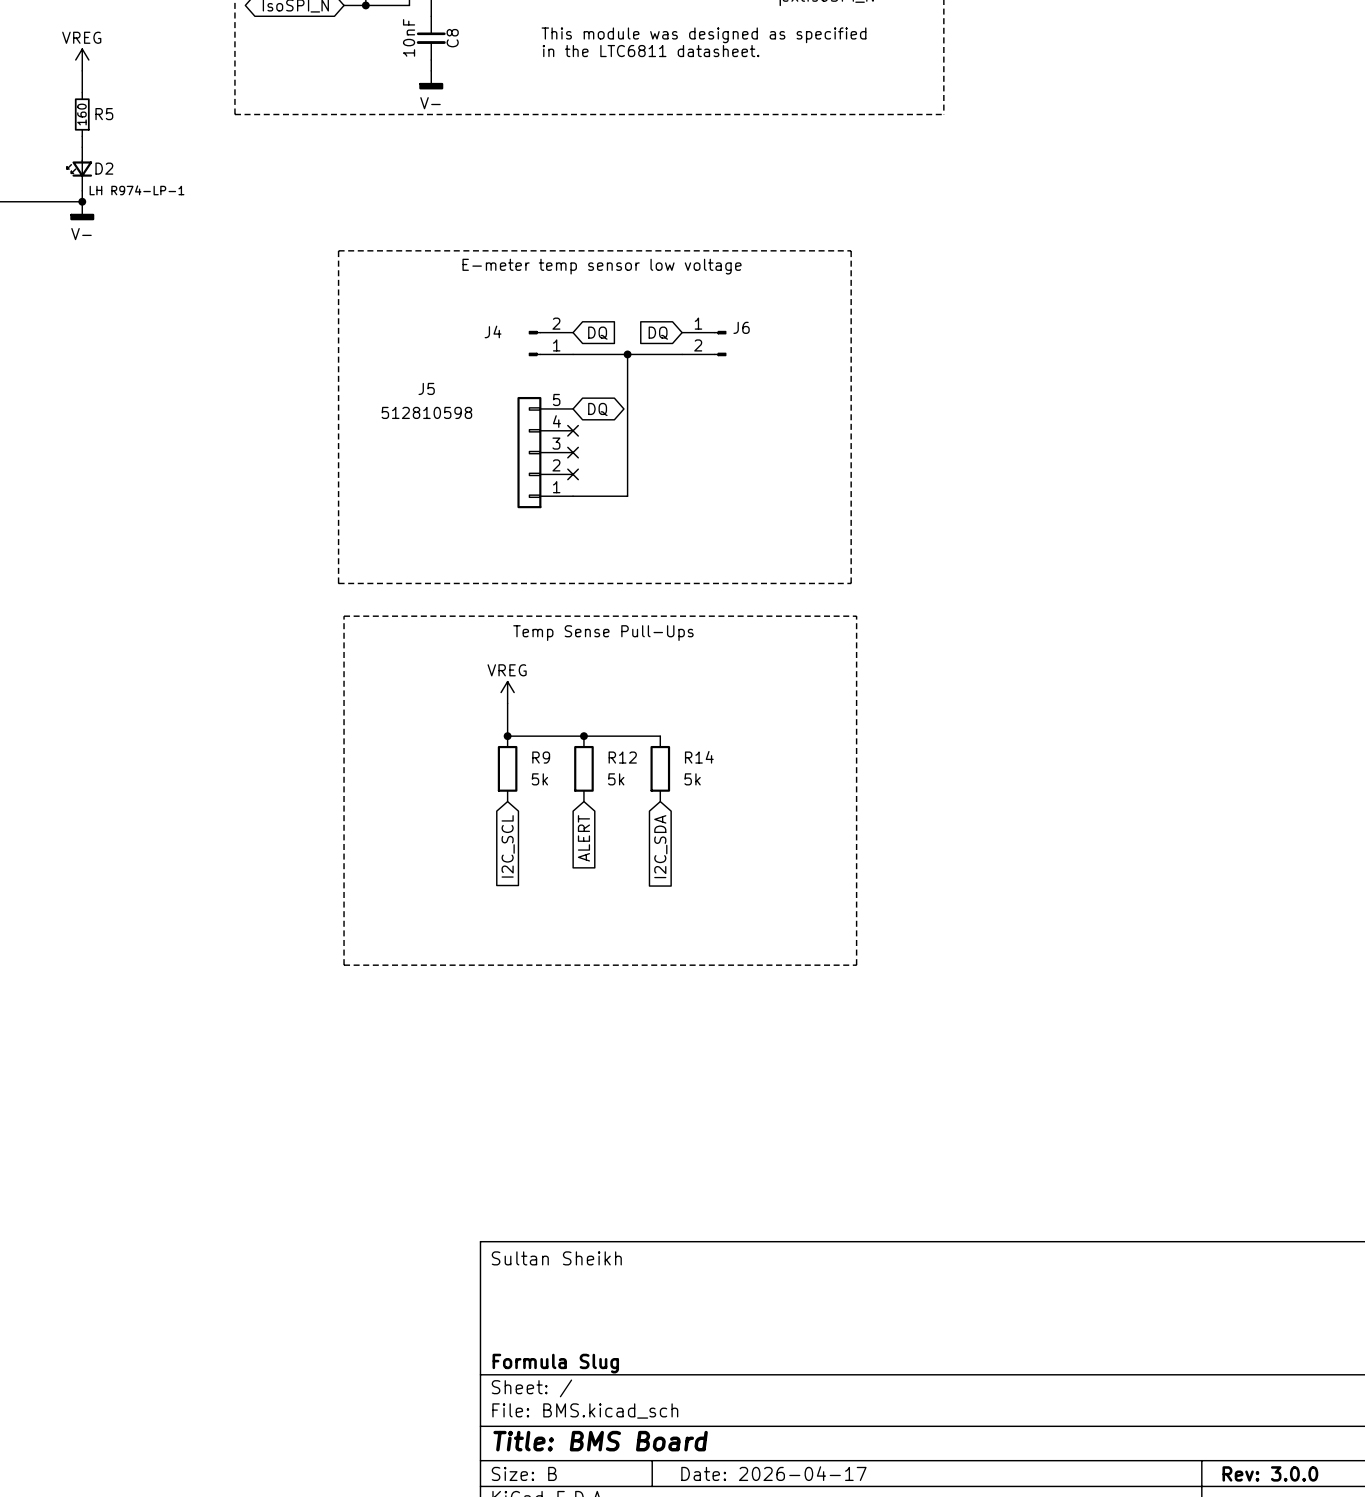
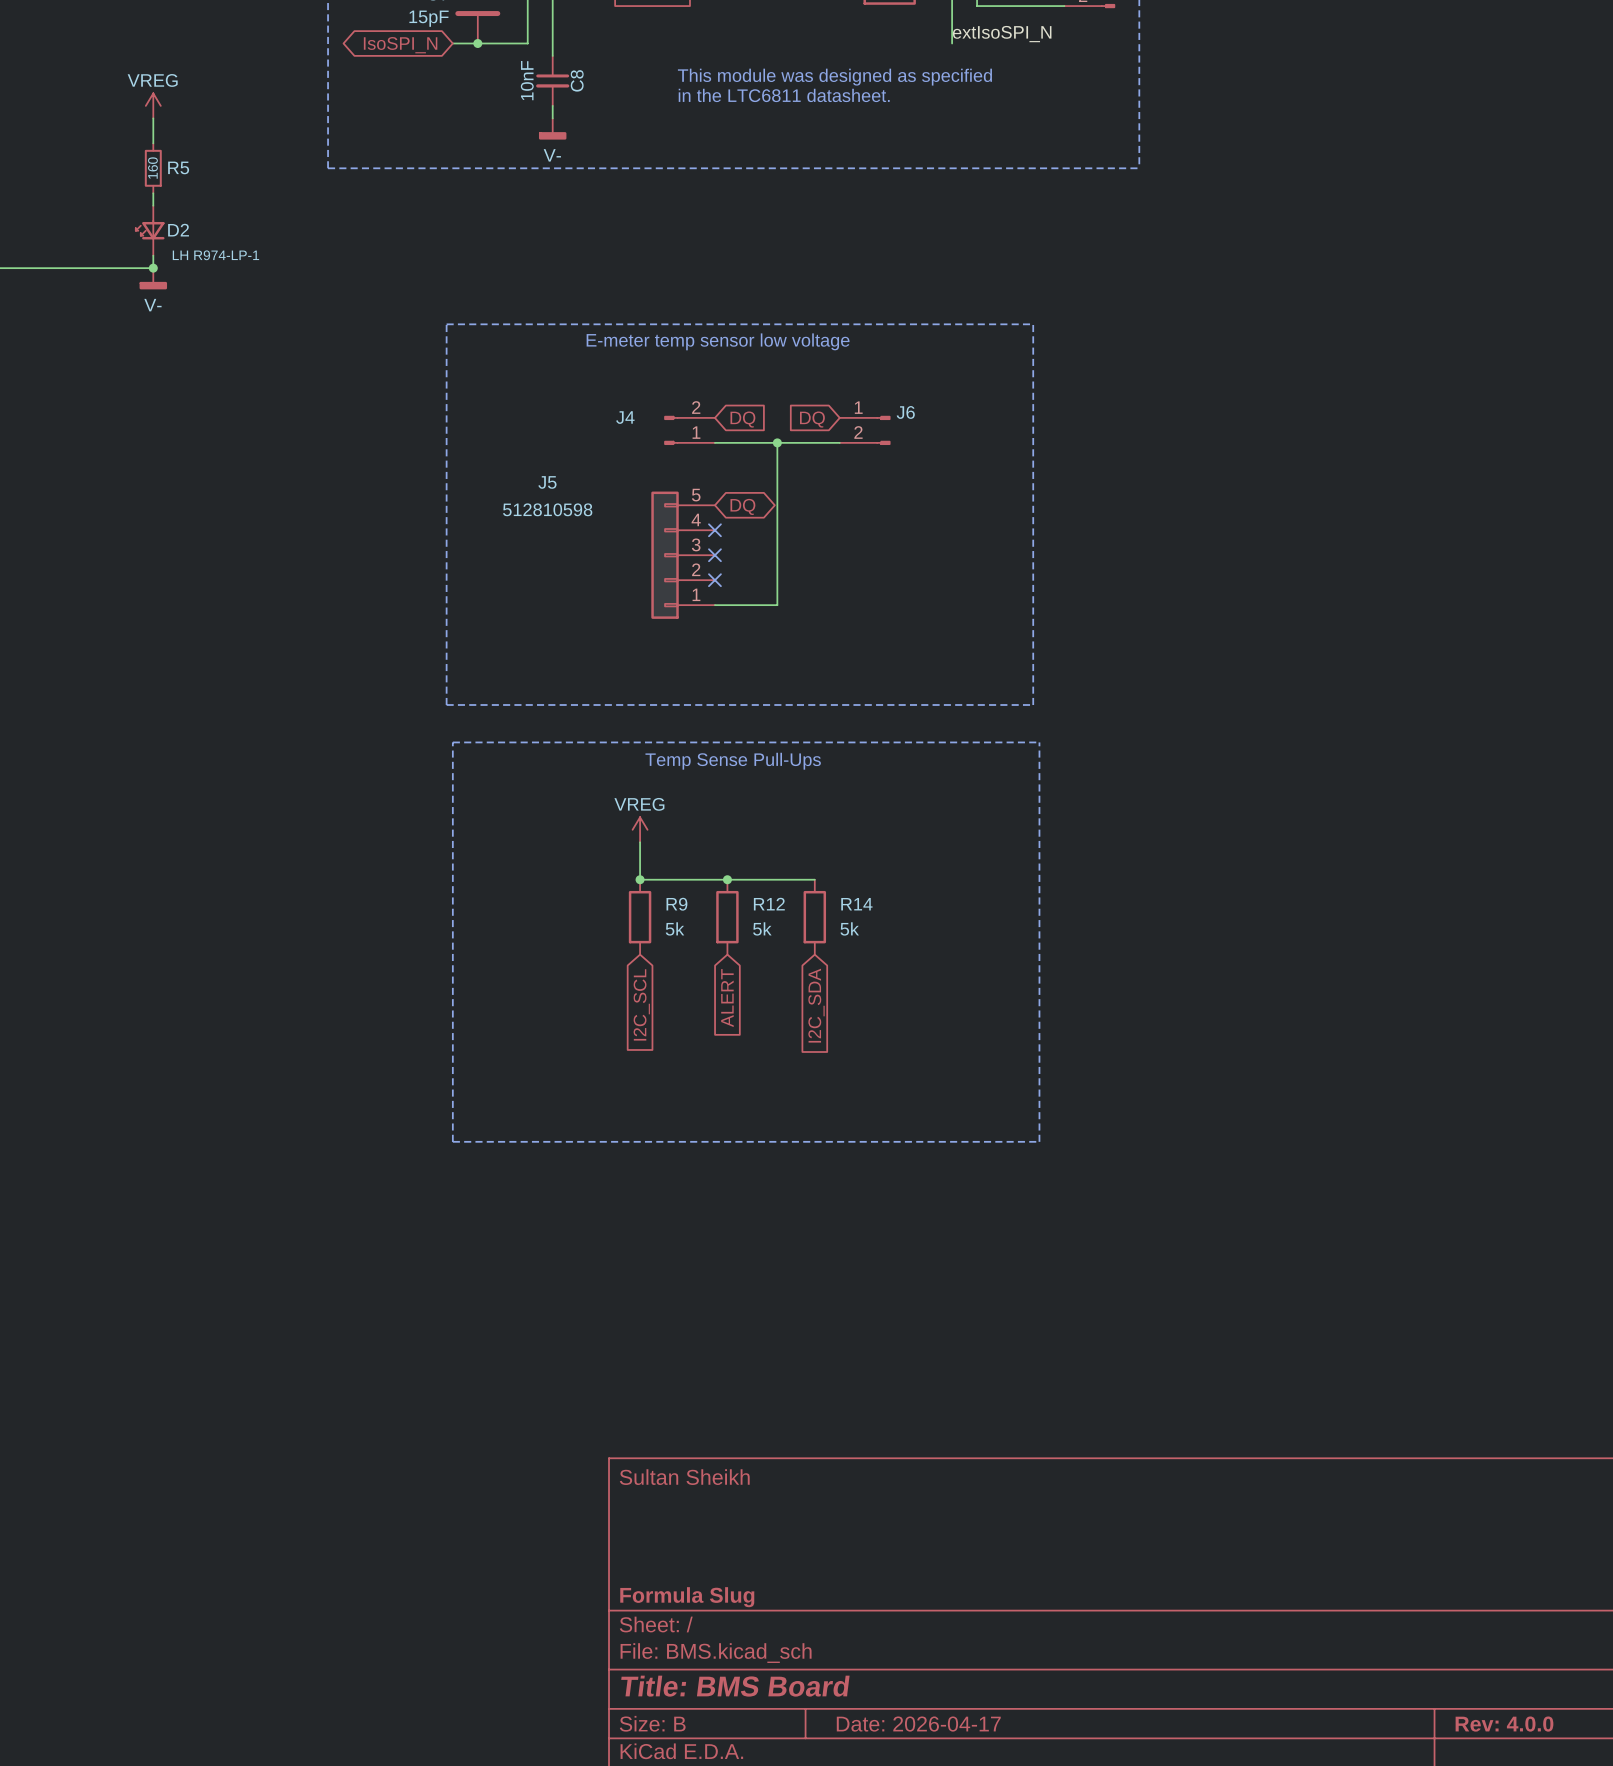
title block: Rev: 3.0.0 (1270, 1473) -> Rev: 4.0.0 (1504, 1724)

